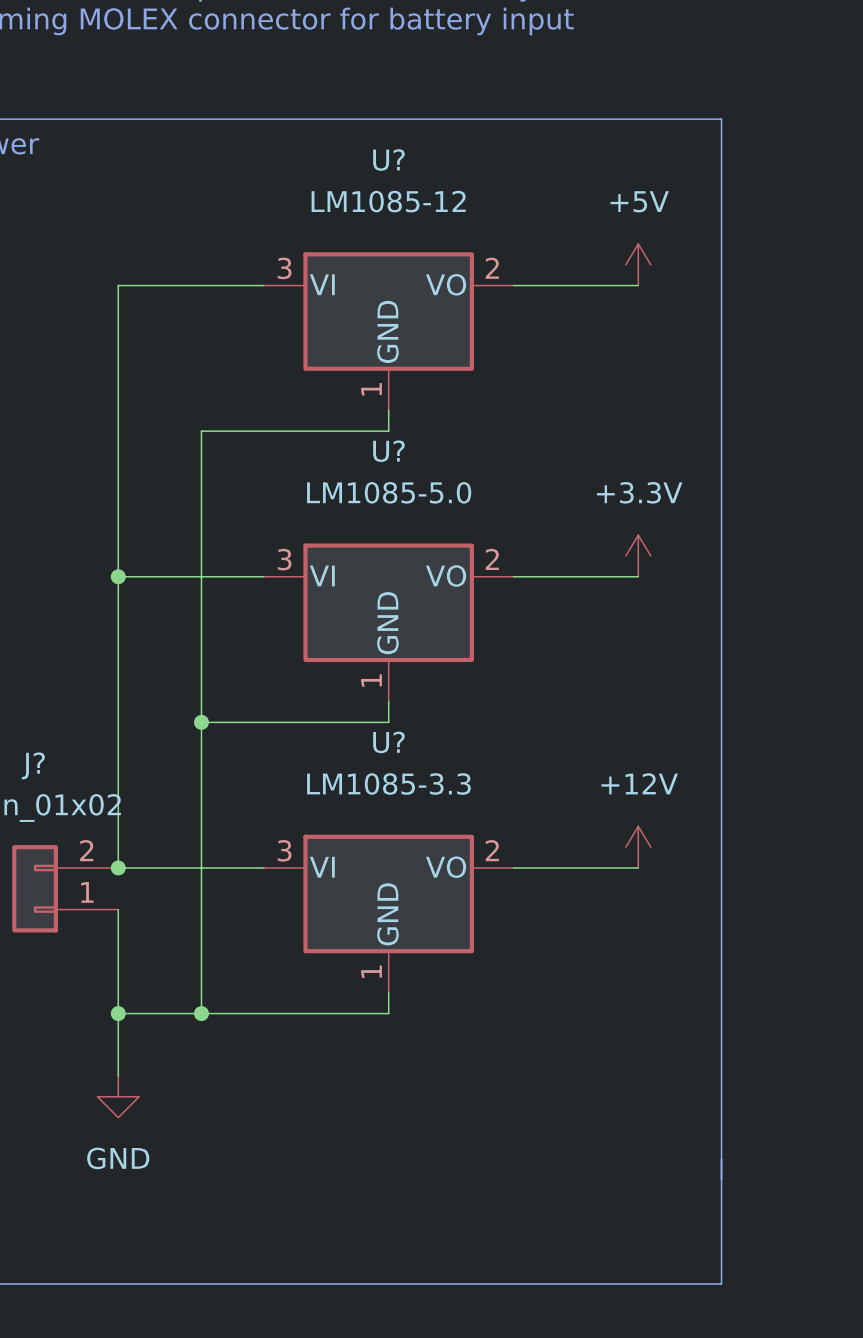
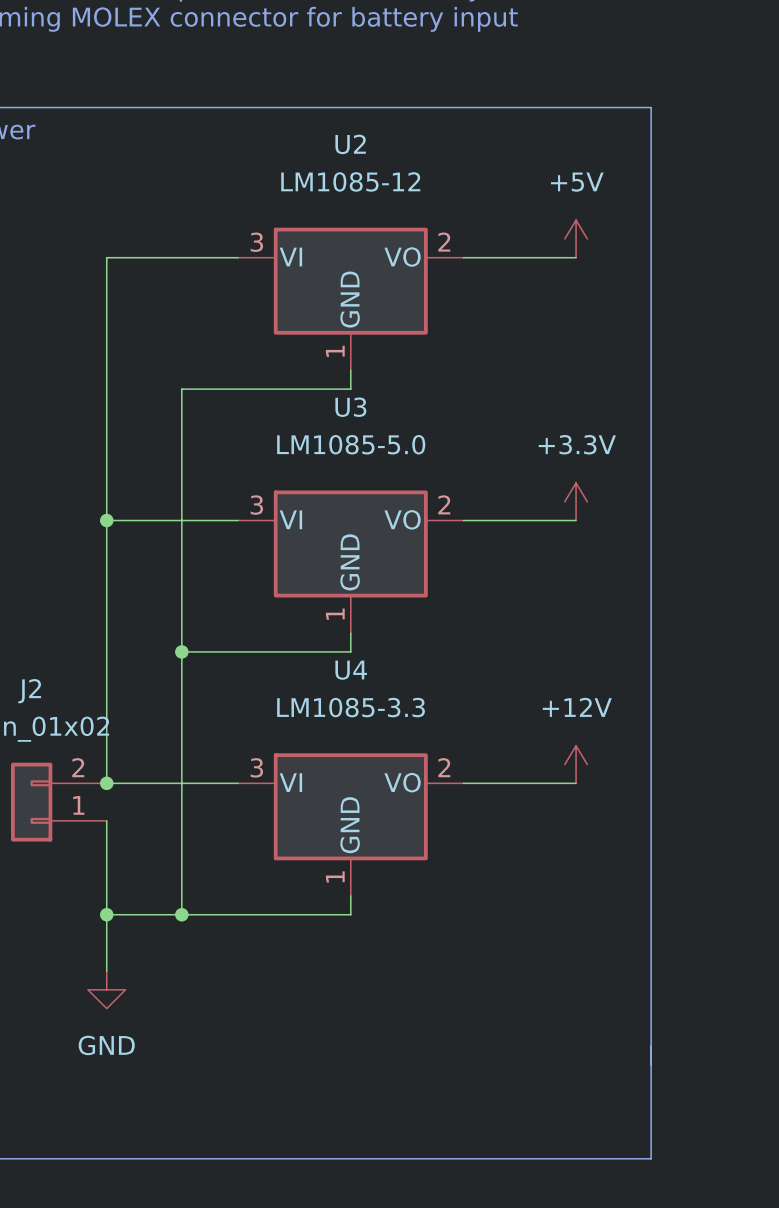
U? name: U? (388, 160) -> U2 (350, 144)
U? name: U? (388, 451) -> U3 (350, 407)
U? name: U? (388, 742) -> U4 (351, 670)
J? name: J? (33, 765) -> J2 (29, 691)

